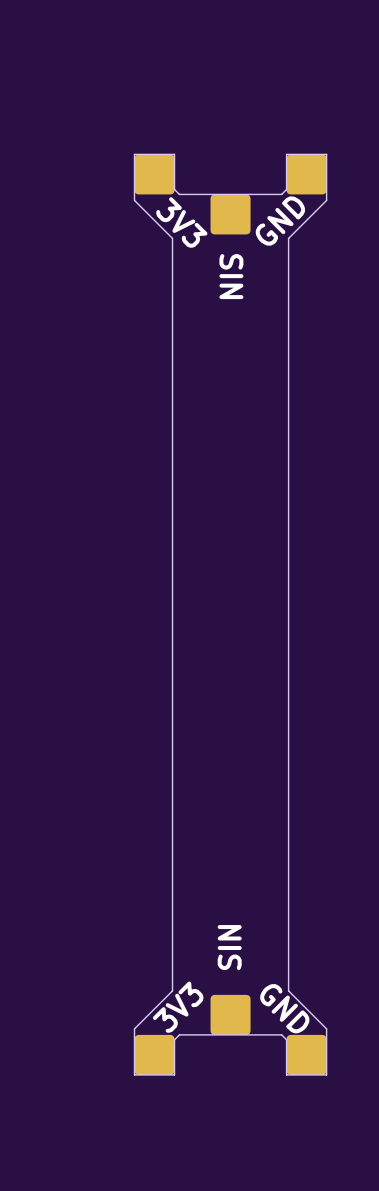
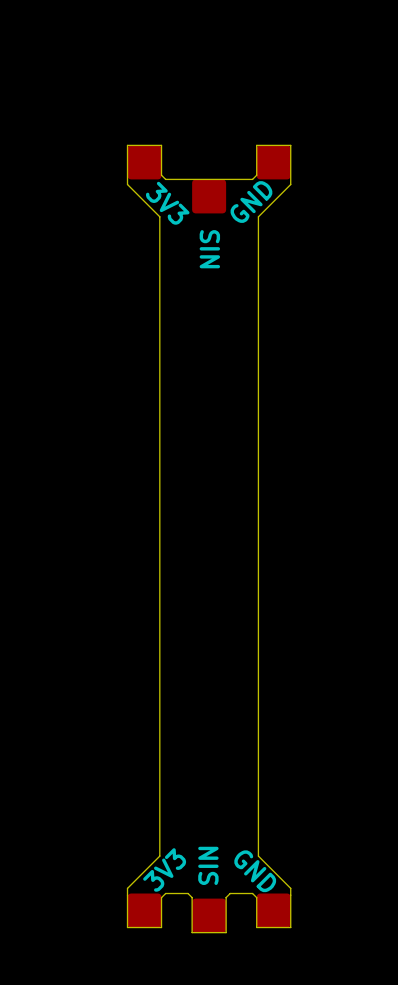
text position: SIN (229, 947) -> SIN (208, 865)
part position: (230, 1014) -> (209, 915)
board edge: (205, 1034) (255, 1034) -> (188, 893) (192, 897) (192, 932) (226, 932) (226, 897) (230, 893)

